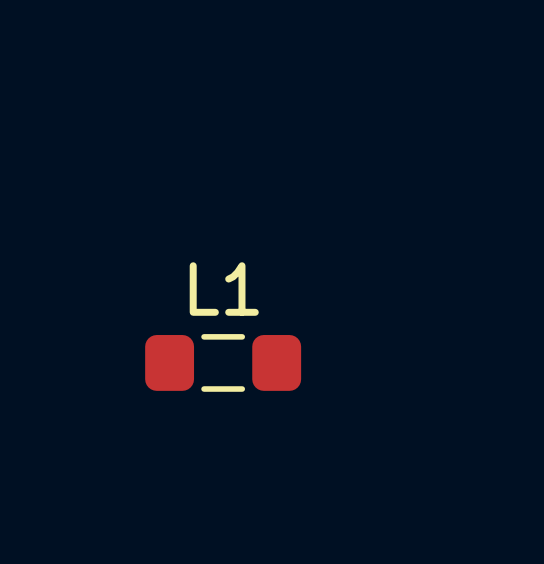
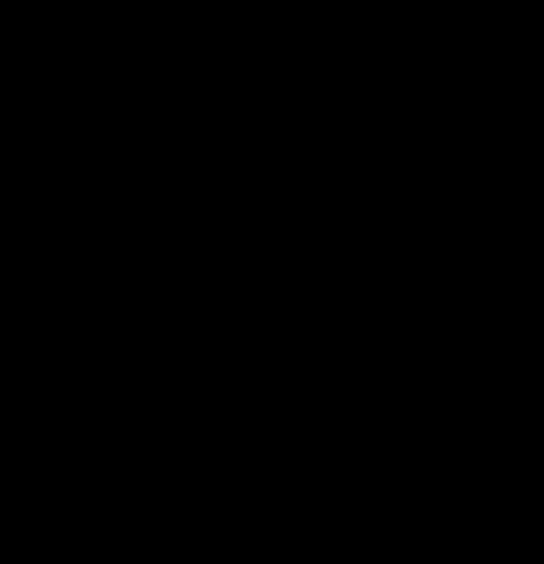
L1: (223, 362) -> none

